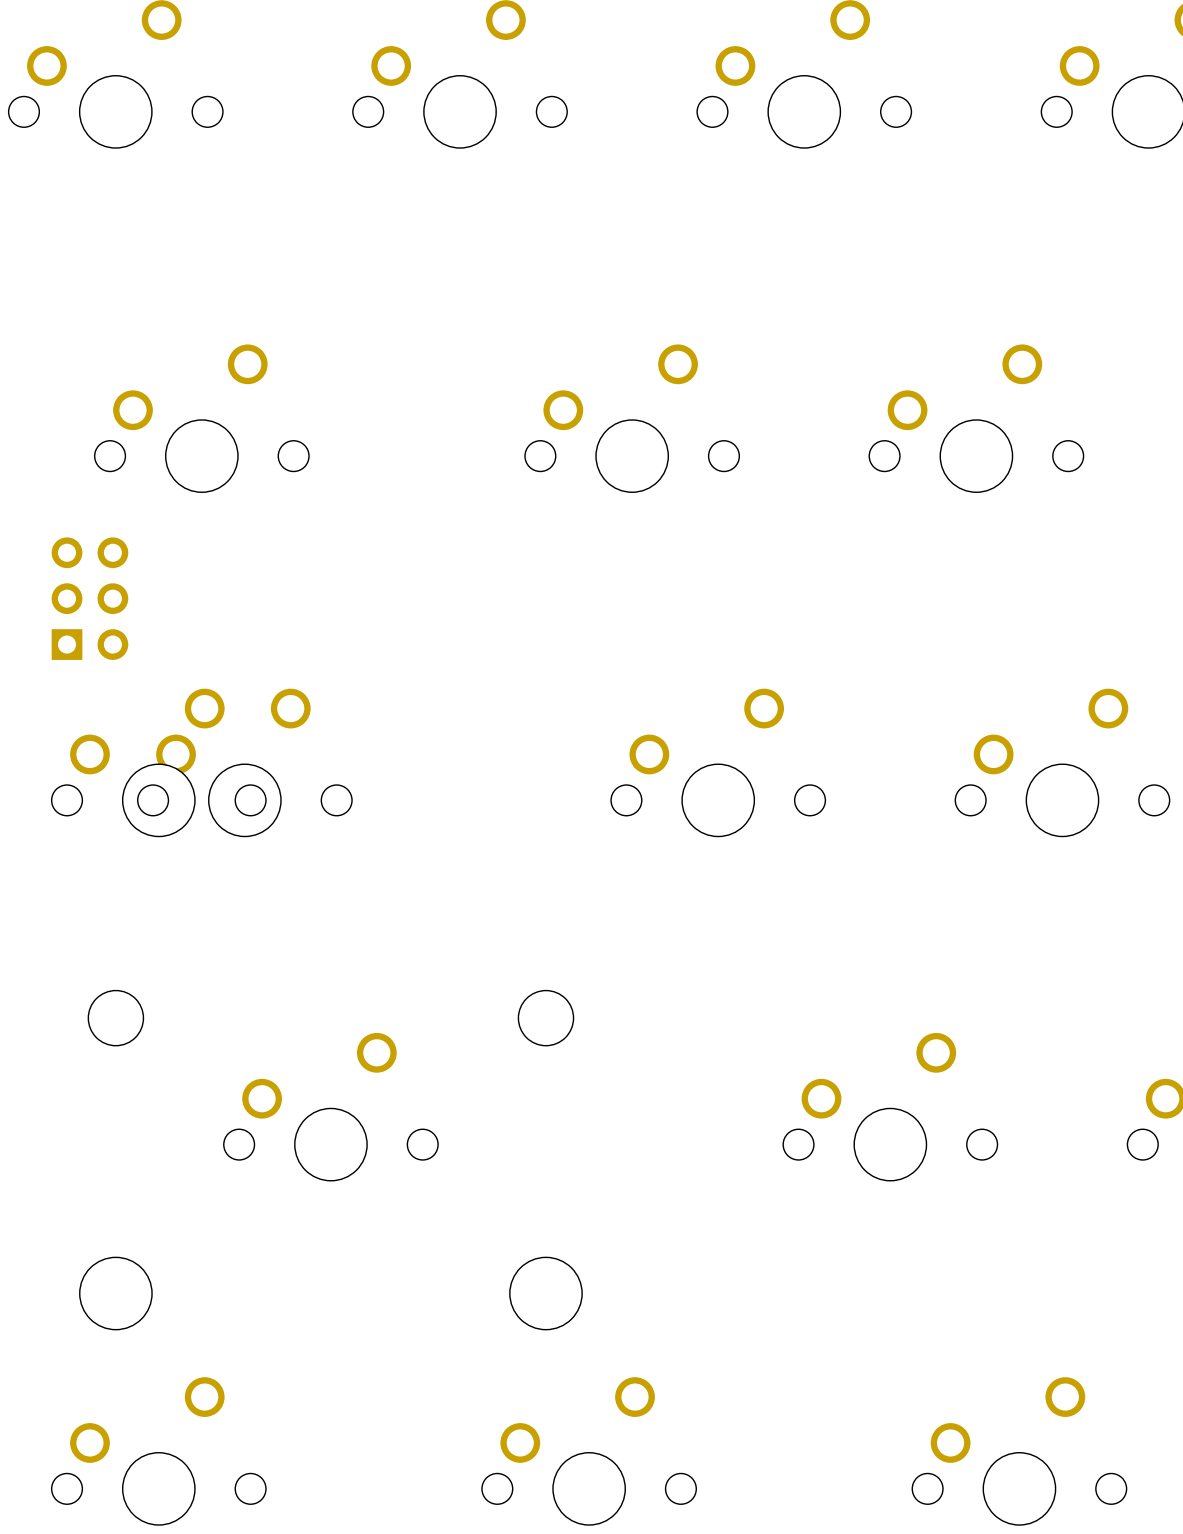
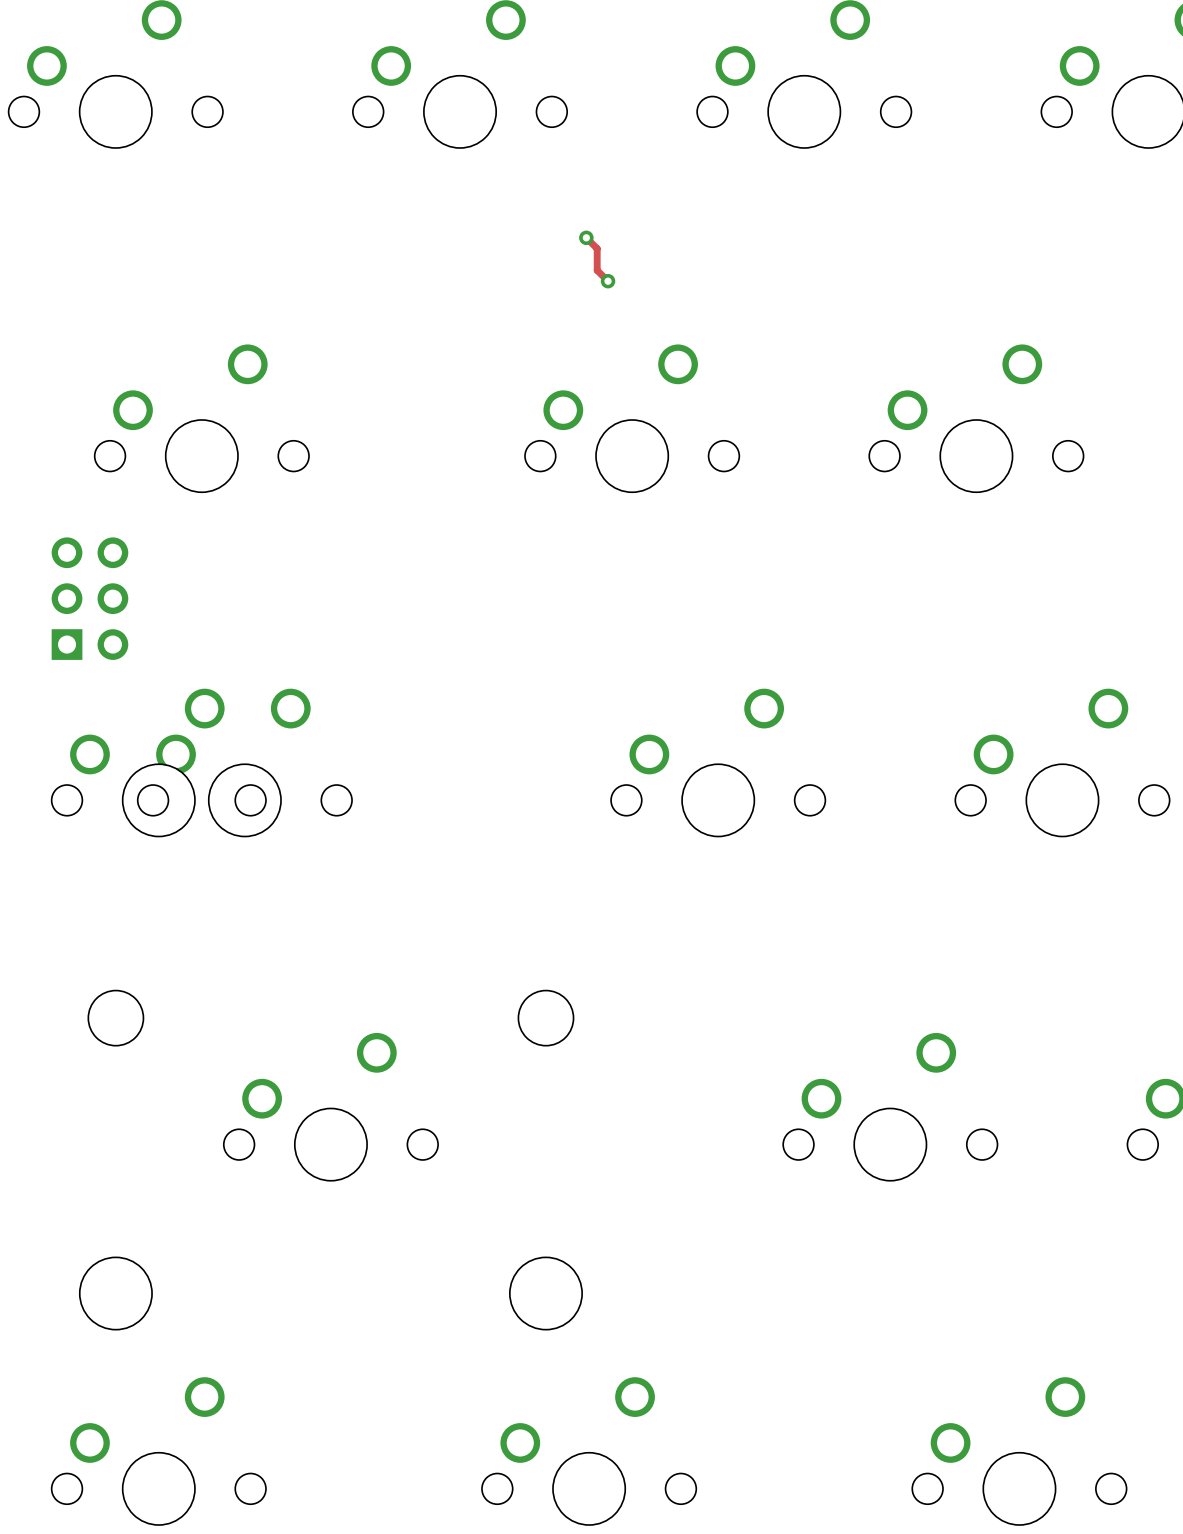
track: none -> (586, 237) (597, 248) (597, 270) (608, 281)
via: none -> (586, 237)
via: none -> (608, 281)

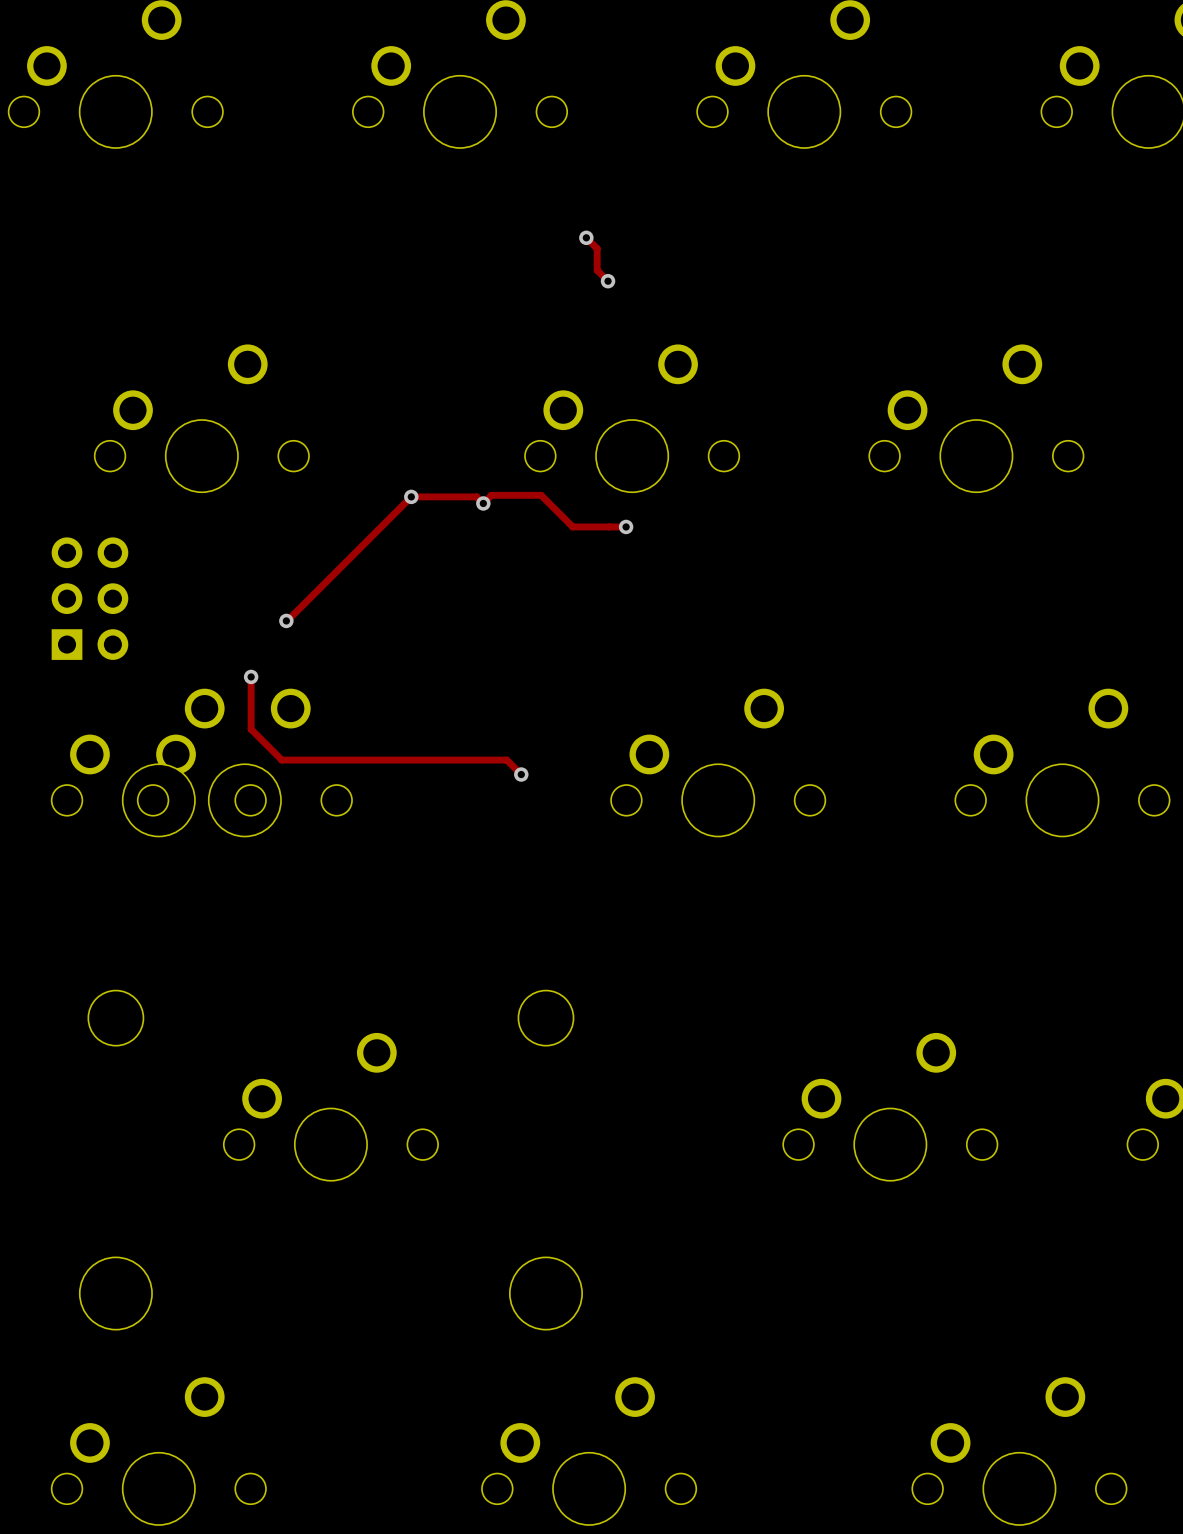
via: none -> (411, 496)
via: none -> (483, 503)
track: none -> (626, 526) (572, 526) (541, 495) (491, 495) (483, 503) (476, 496) (411, 496) (286, 620)
via: none -> (626, 526)
via: none -> (286, 620)
track: none -> (251, 676) (251, 729) (281, 760) (506, 760) (521, 774)
via: none -> (251, 676)
via: none -> (521, 774)

